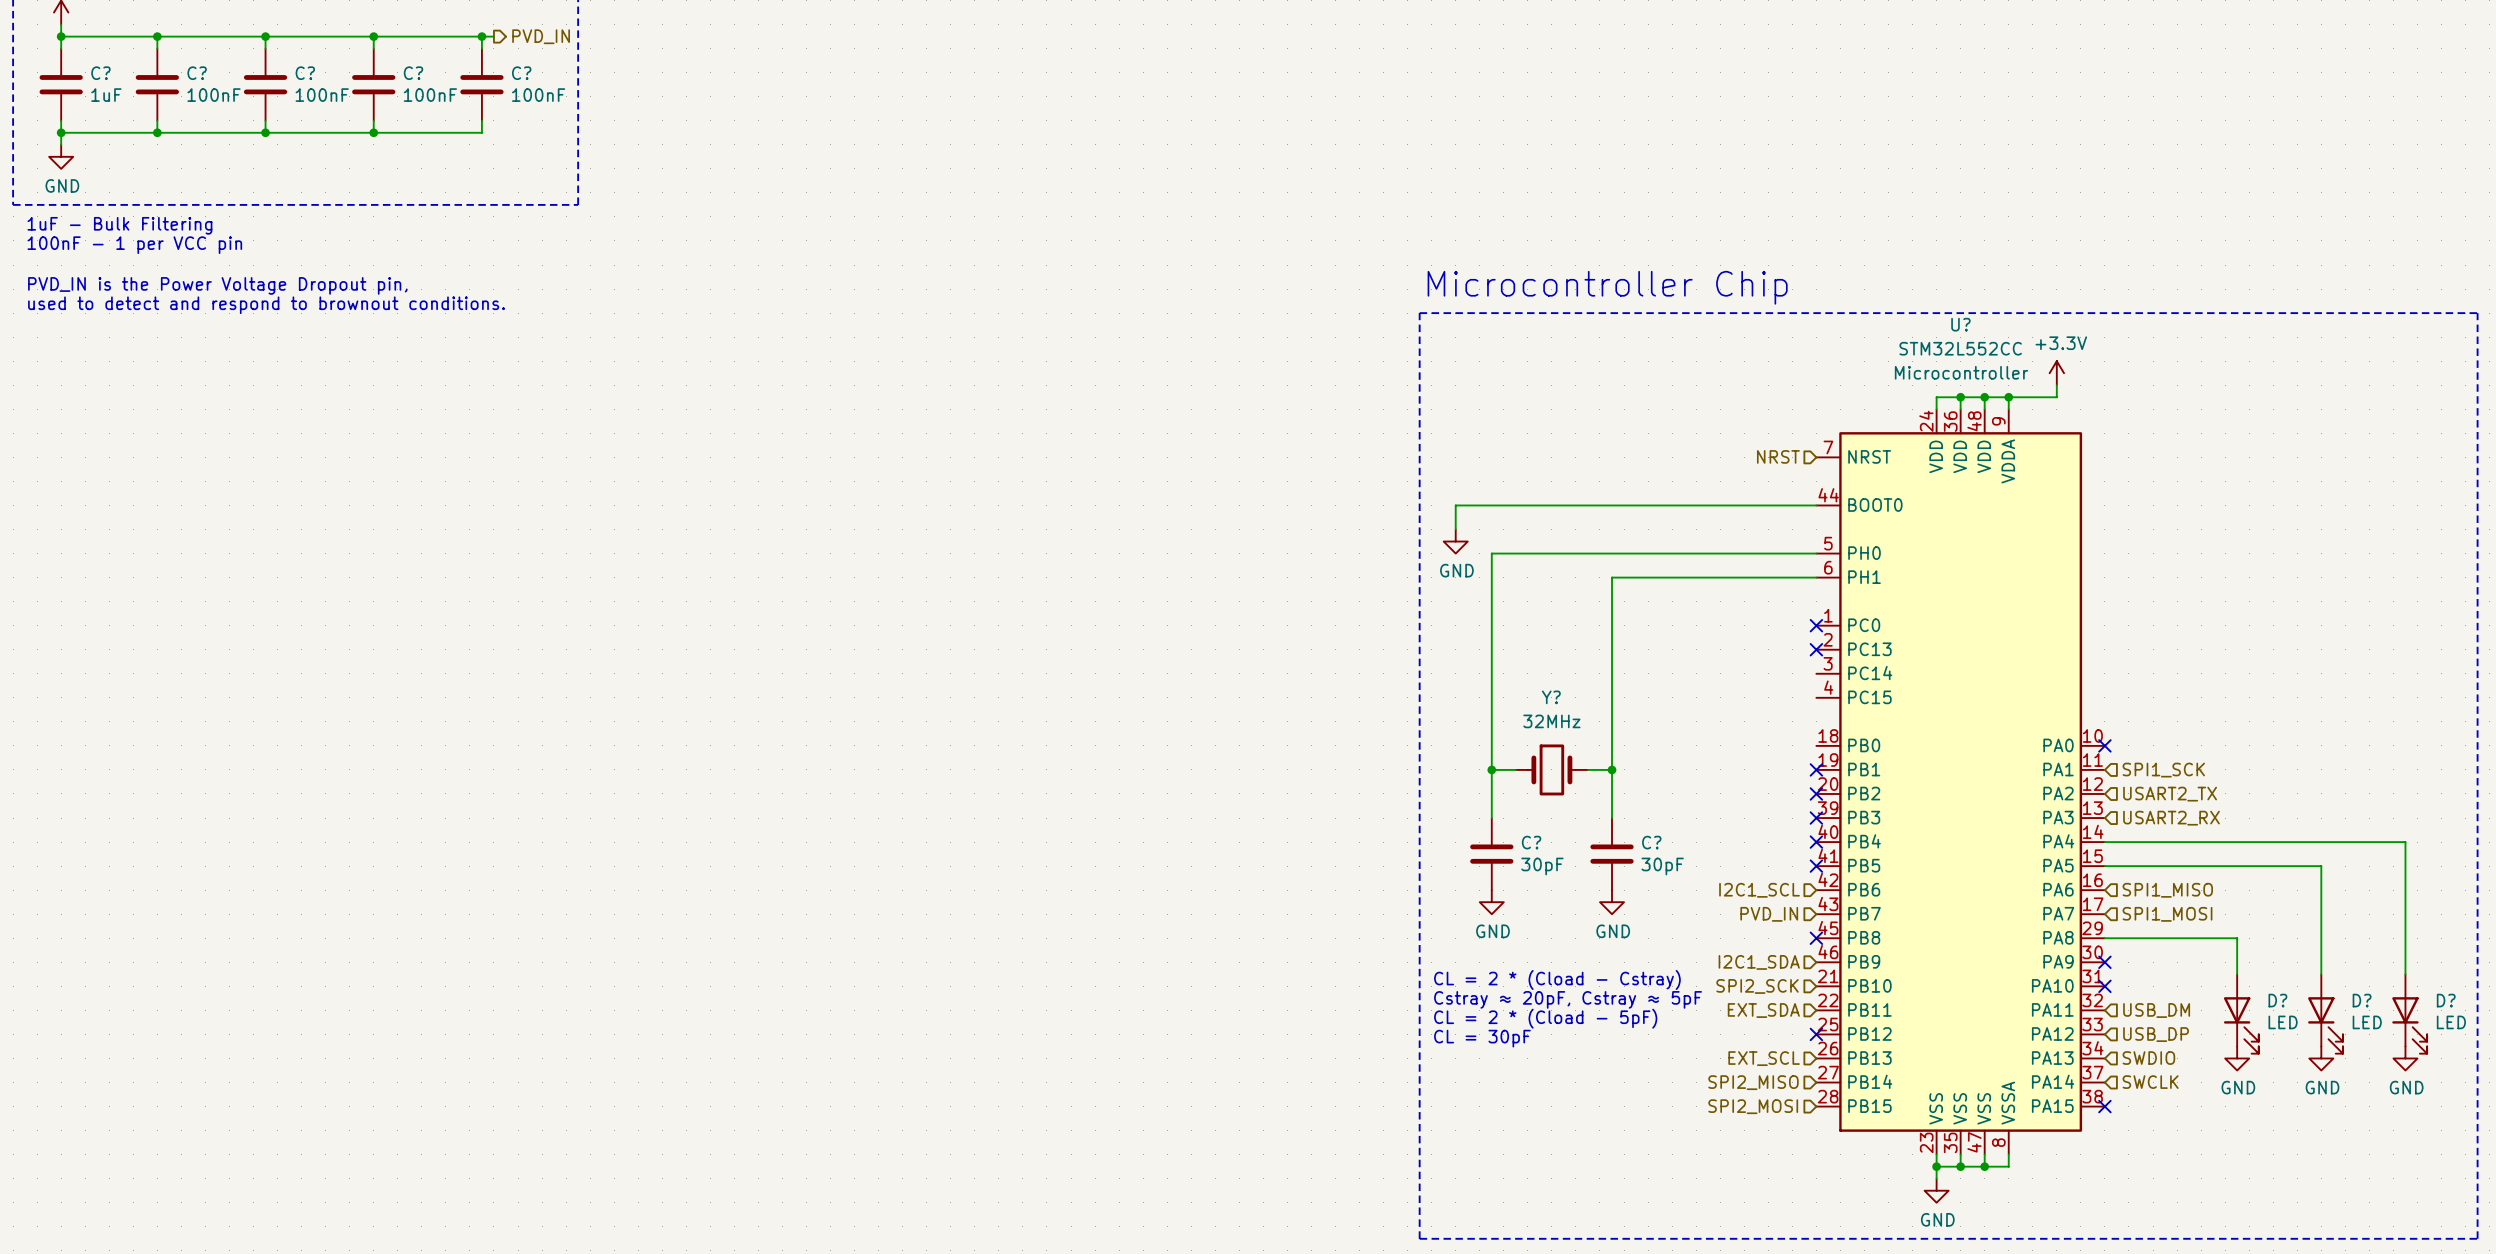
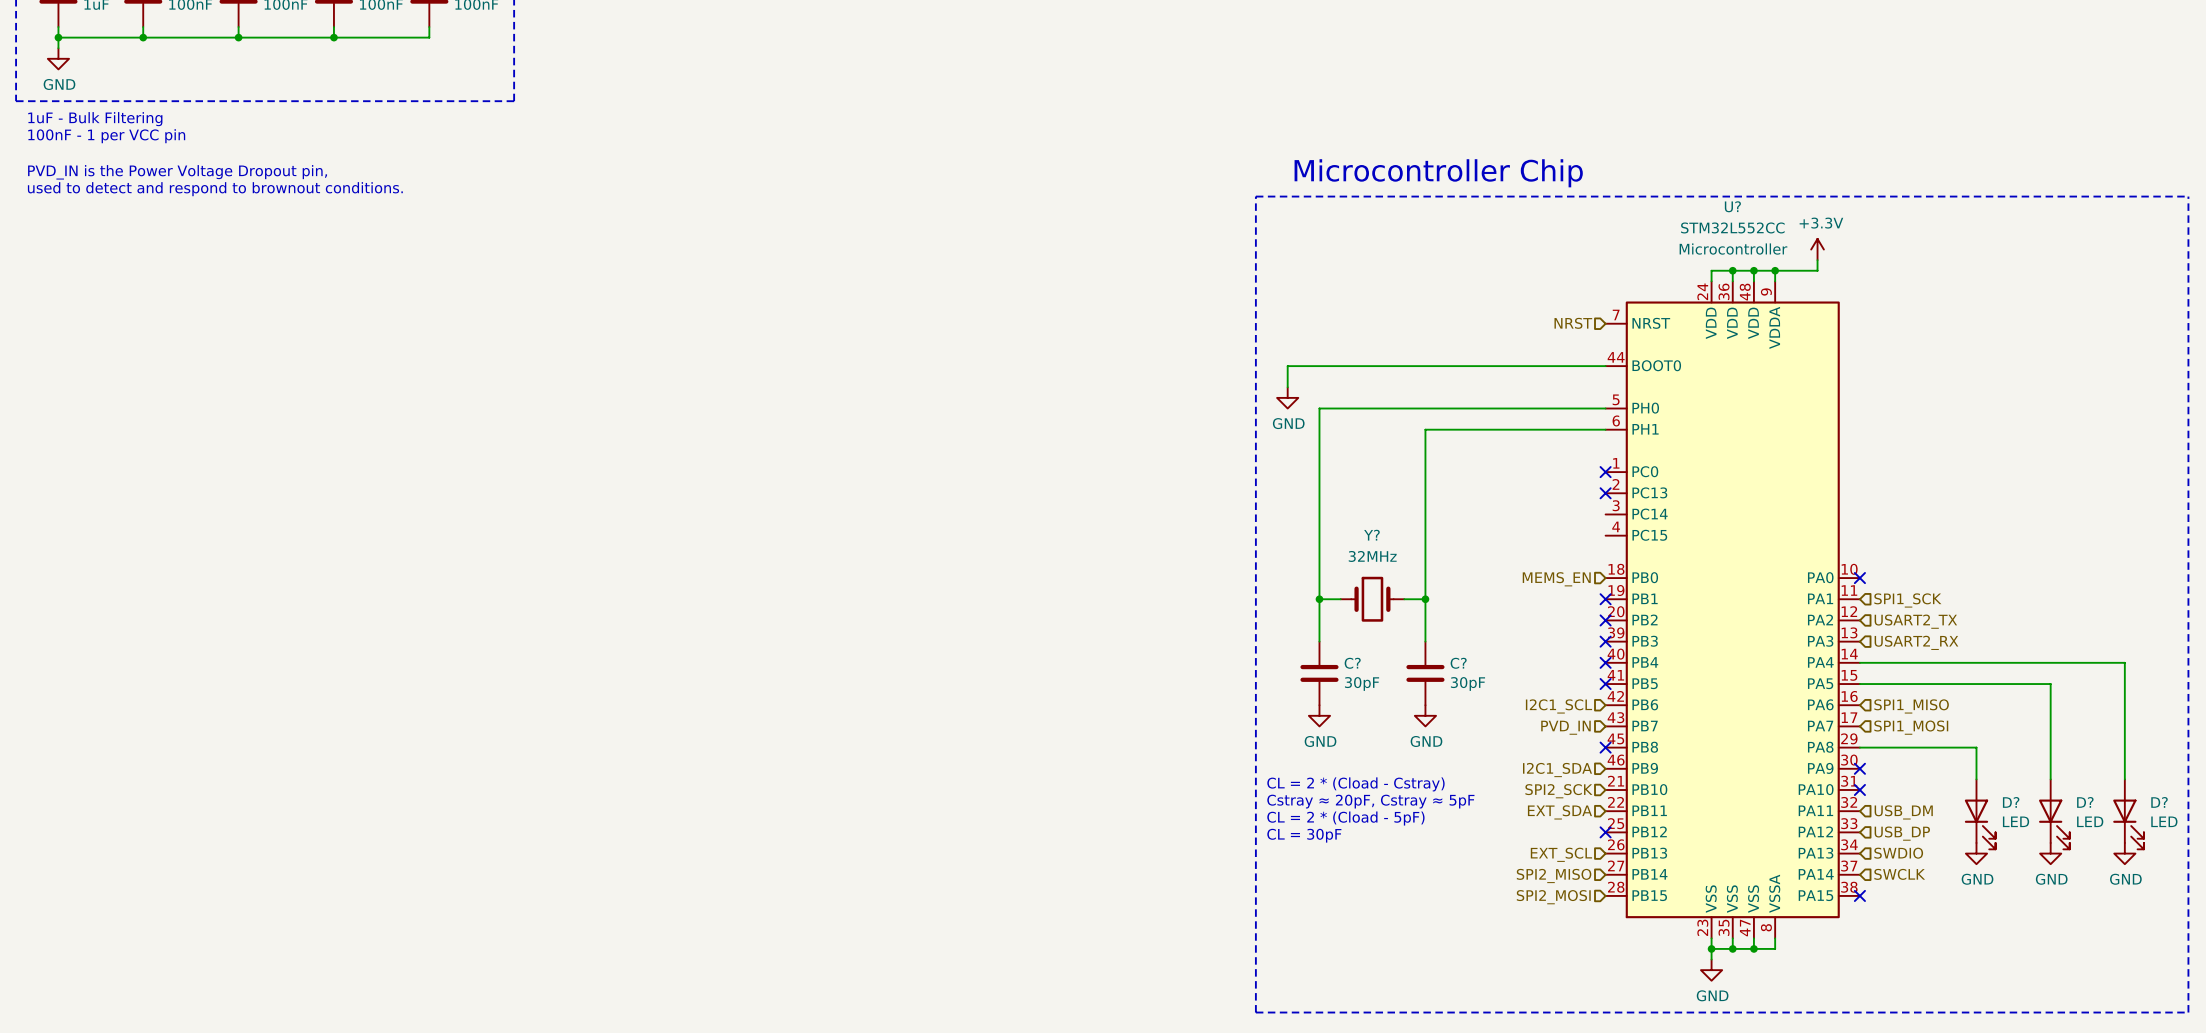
hierarchical label: none -> MEMS_EN (1556, 579)

